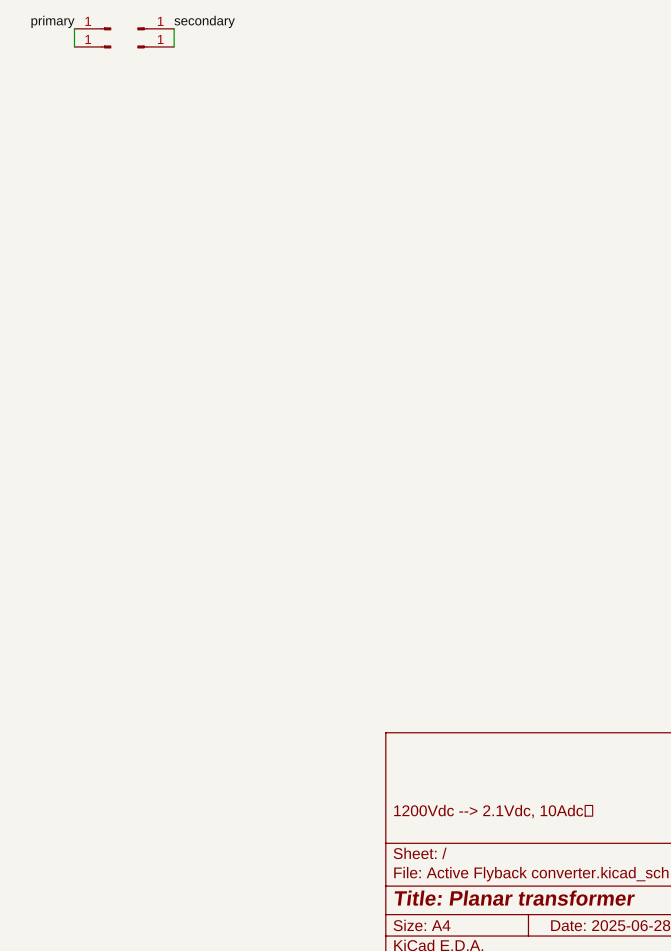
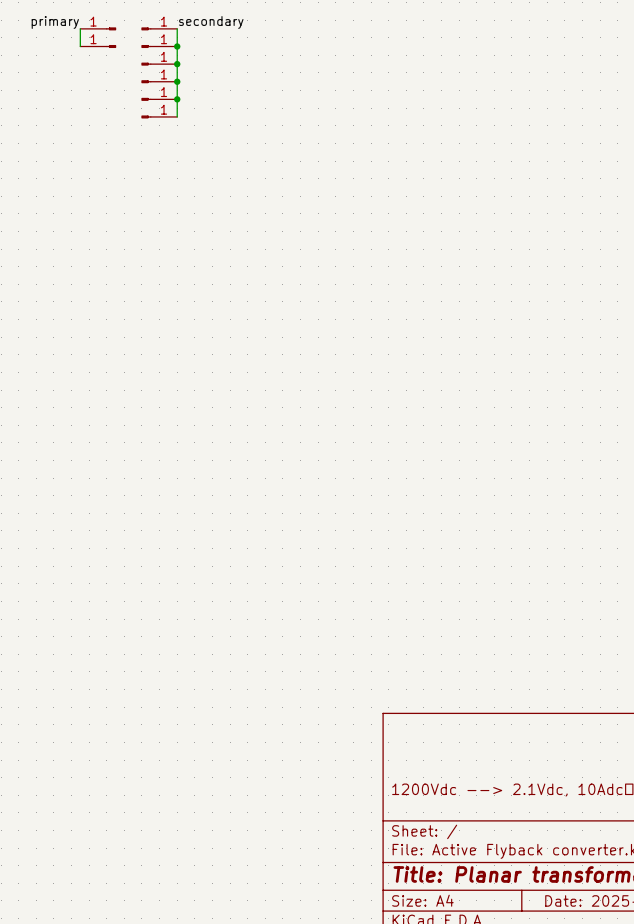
wire: none -> (177, 46) (177, 116)
junction: none -> (177, 46)
part: none -> (159, 64)
junction: none -> (177, 64)
part: none -> (159, 81)
junction: none -> (177, 81)
part: none -> (159, 99)
junction: none -> (177, 99)
part: none -> (159, 116)

